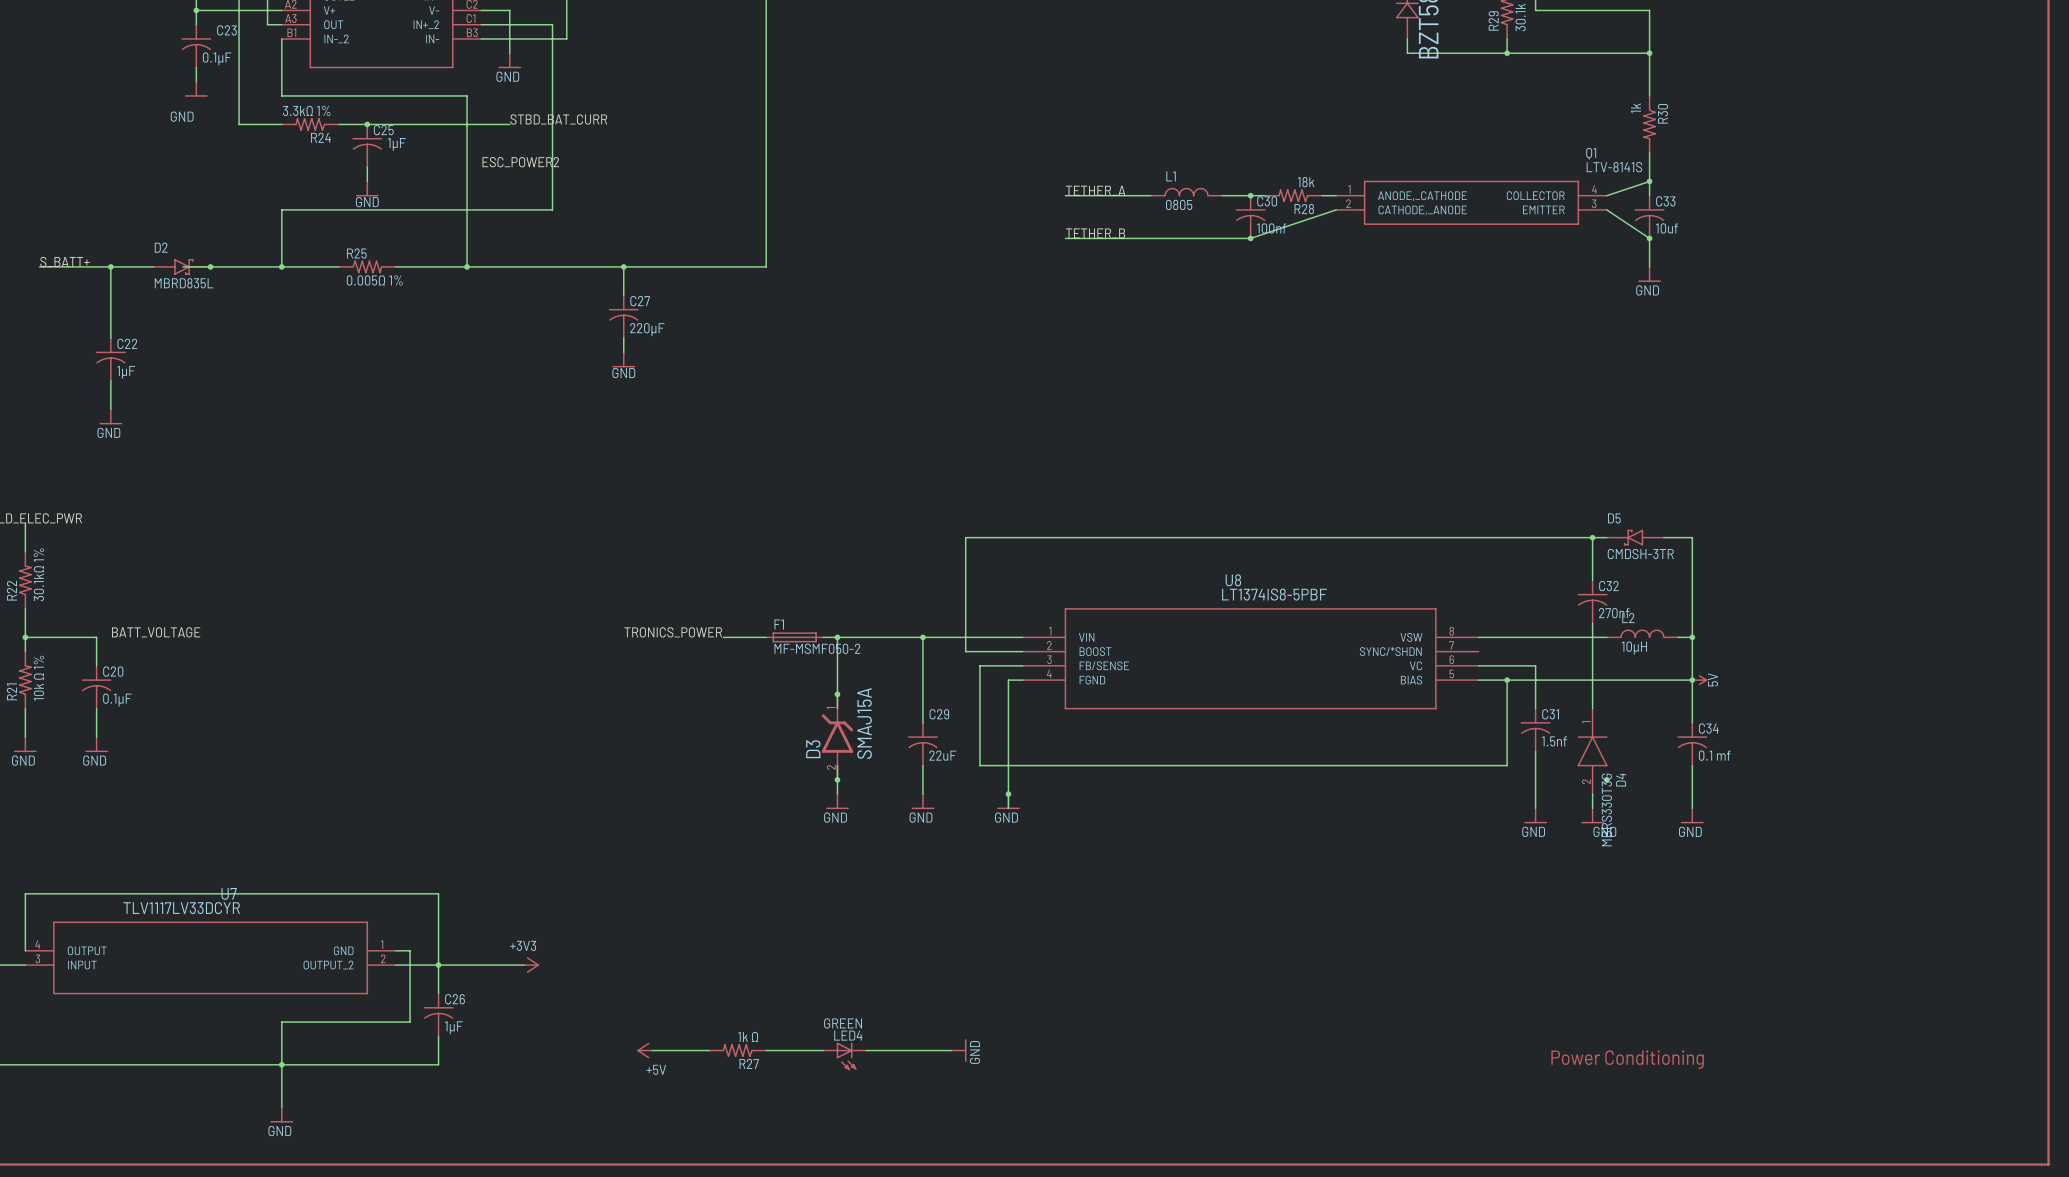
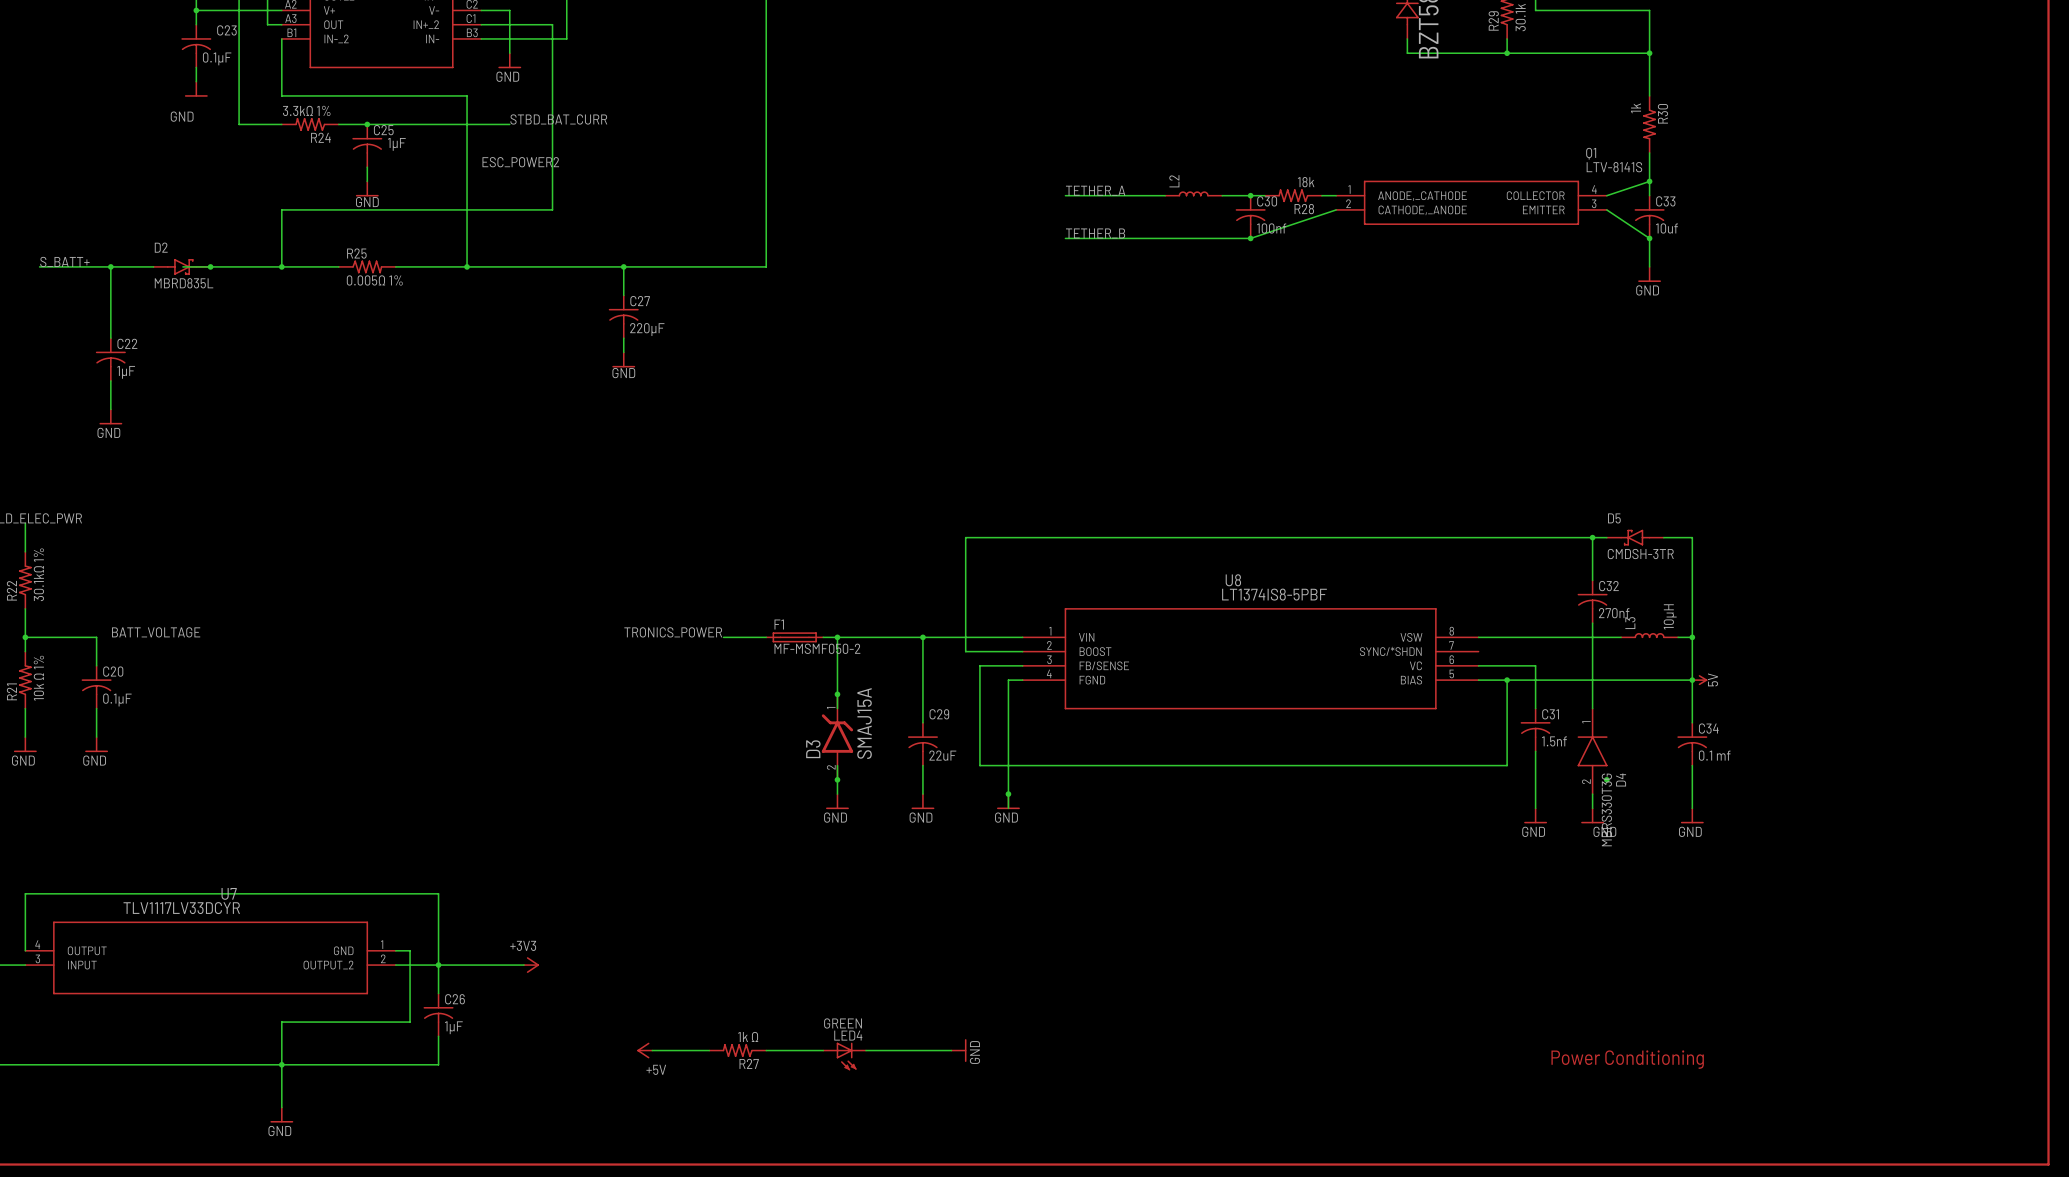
L1: 0805 (1186, 192) -> none
L2 symbol: [1606, 629, 1679, 639] -> [1165, 191, 1223, 197]
L3: none -> 10μH (1649, 635)
L2 value: 10µH (1634, 647) -> none

